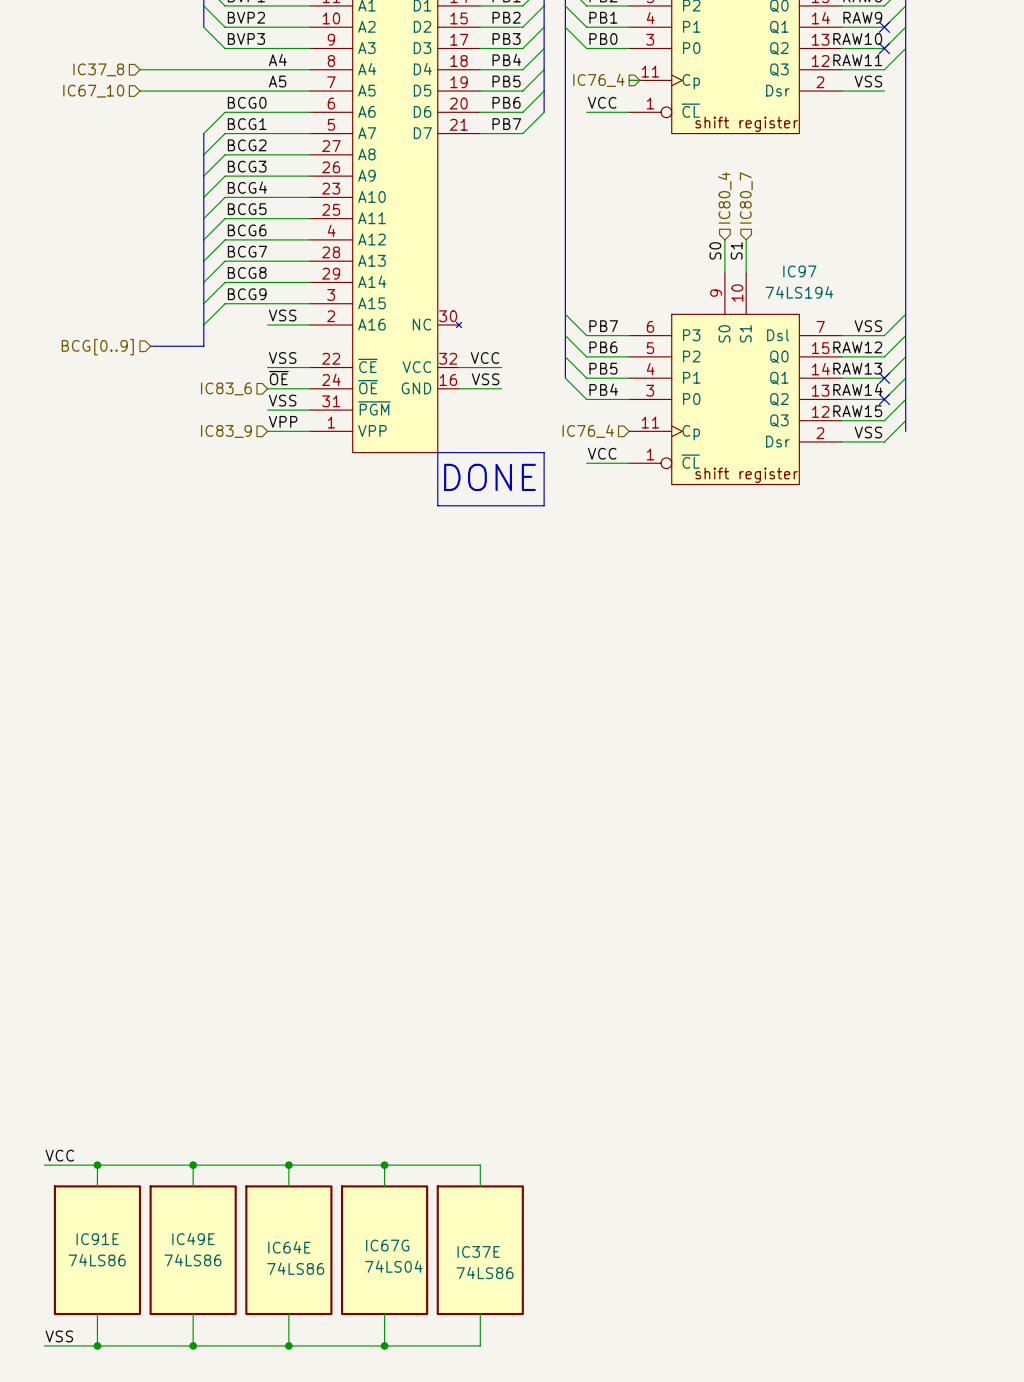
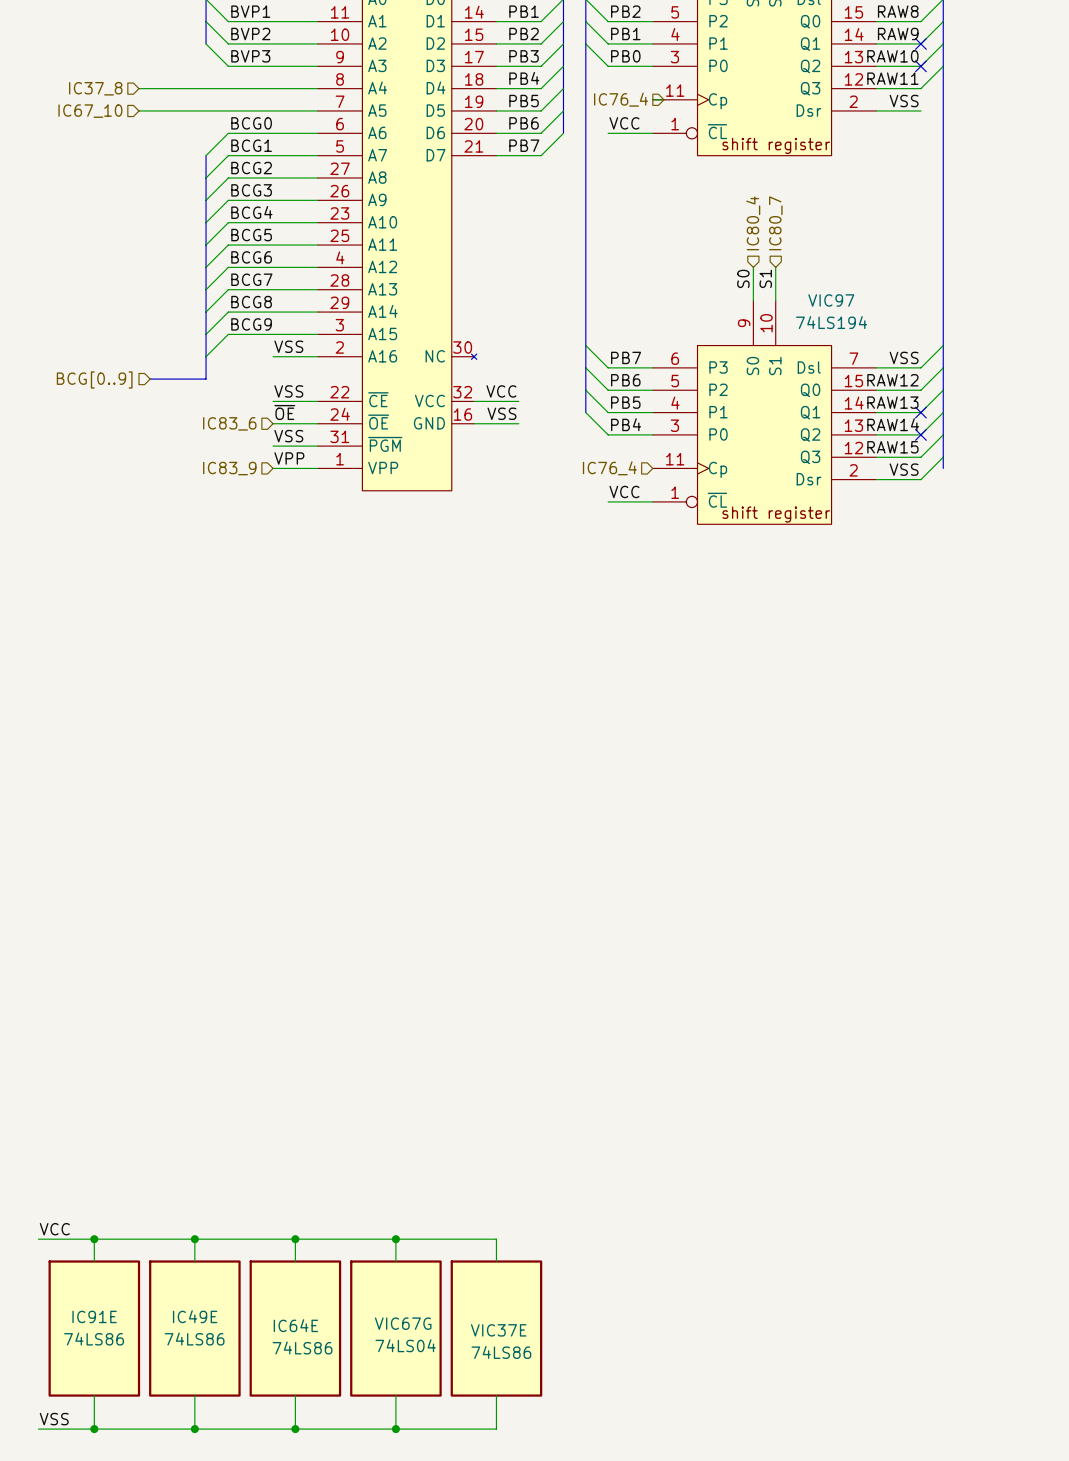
label: A4 (277, 60) -> none
label: A5 (277, 81) -> none
IC97 name: IC97 (799, 271) -> VIC97 (831, 300)
line: (437, 452) (544, 452) (544, 505) (437, 505) (437, 452) -> none
text: DONE (490, 477) -> none
IC67G name: IC67G (387, 1245) -> VIC67G (403, 1323)
IC37E name: IC37E (478, 1251) -> VIC37E (498, 1330)

